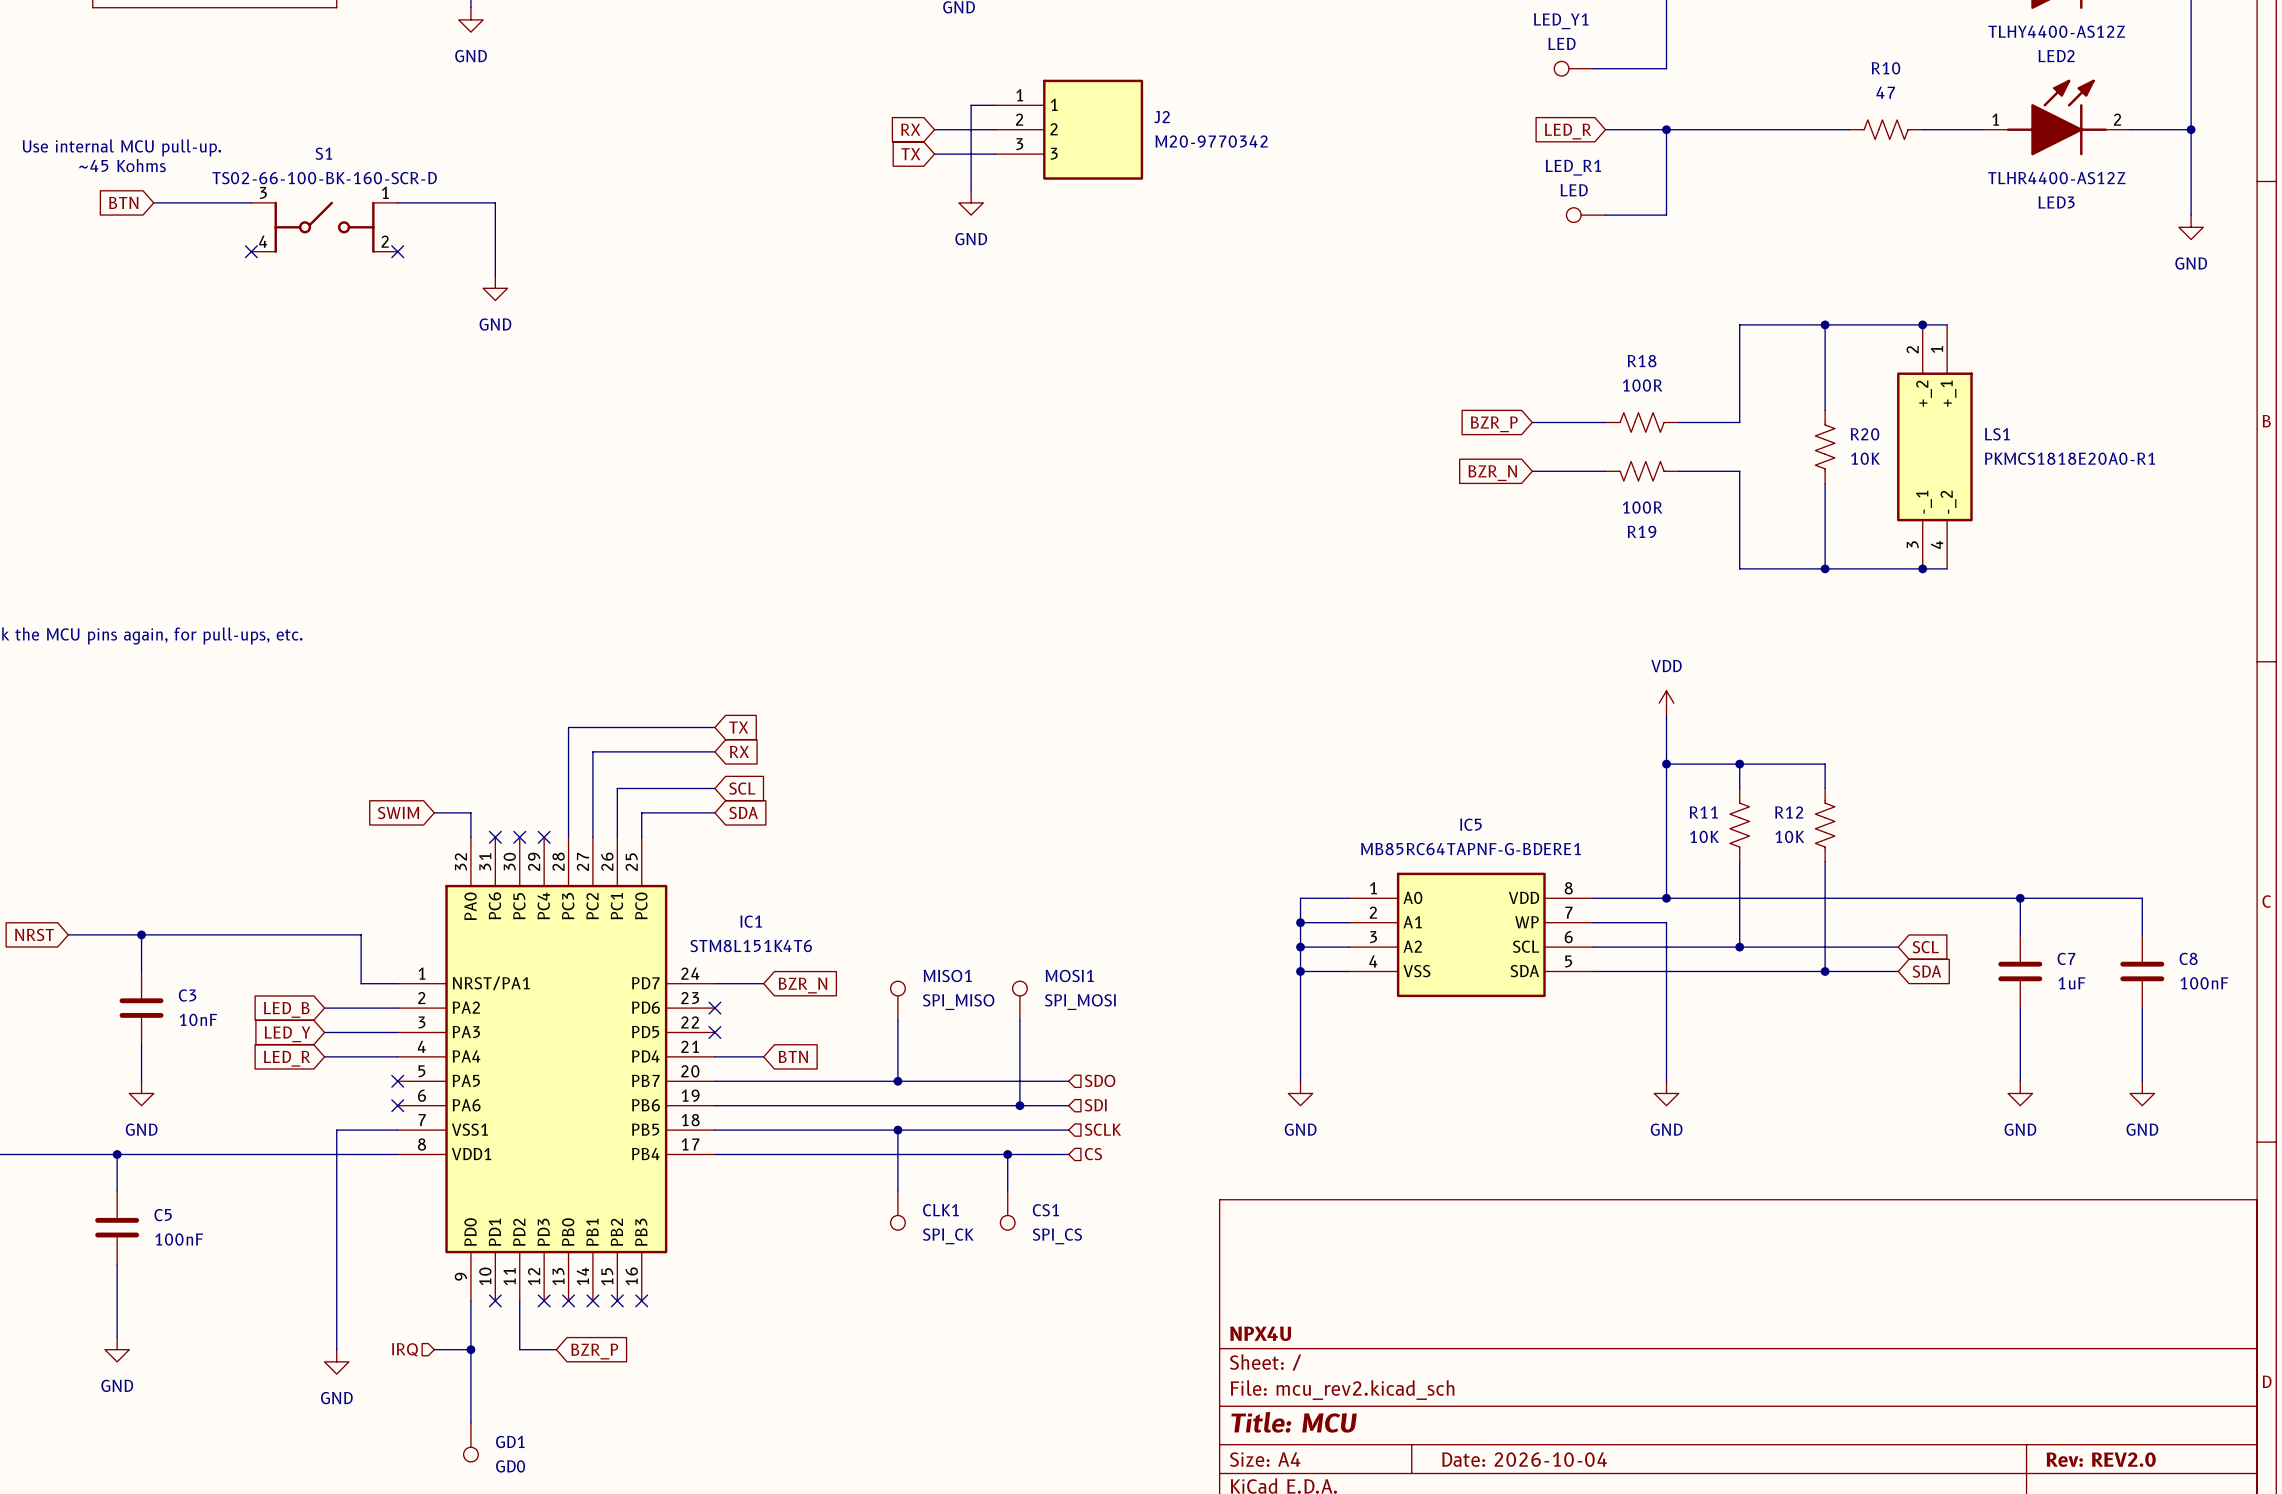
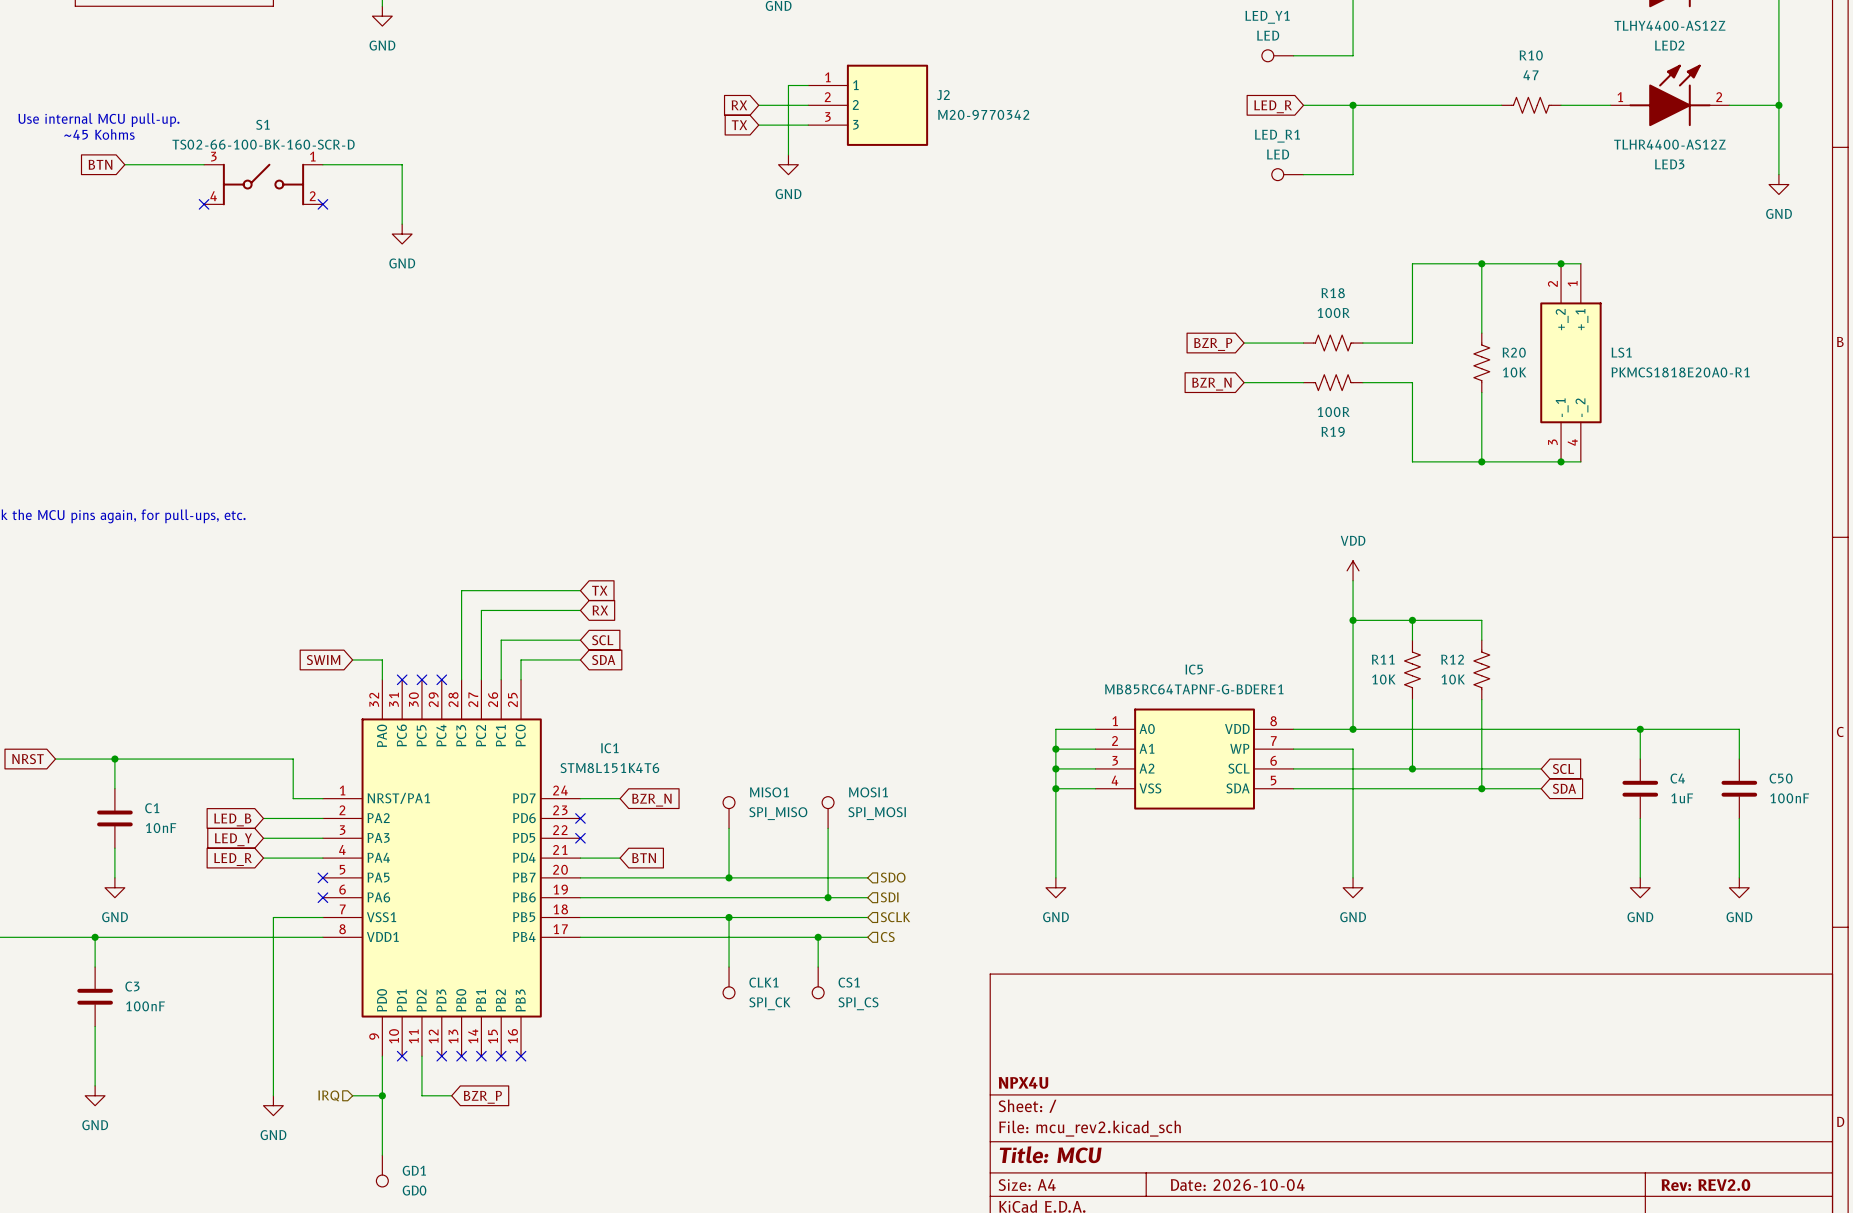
C7 name: C7 (2066, 958) -> C4 (1677, 778)
C8 name: C8 (2188, 958) -> C50 (1781, 778)
C3 name: C3 (187, 995) -> C1 (152, 808)
C5 name: C5 (163, 1215) -> C3 (132, 986)

